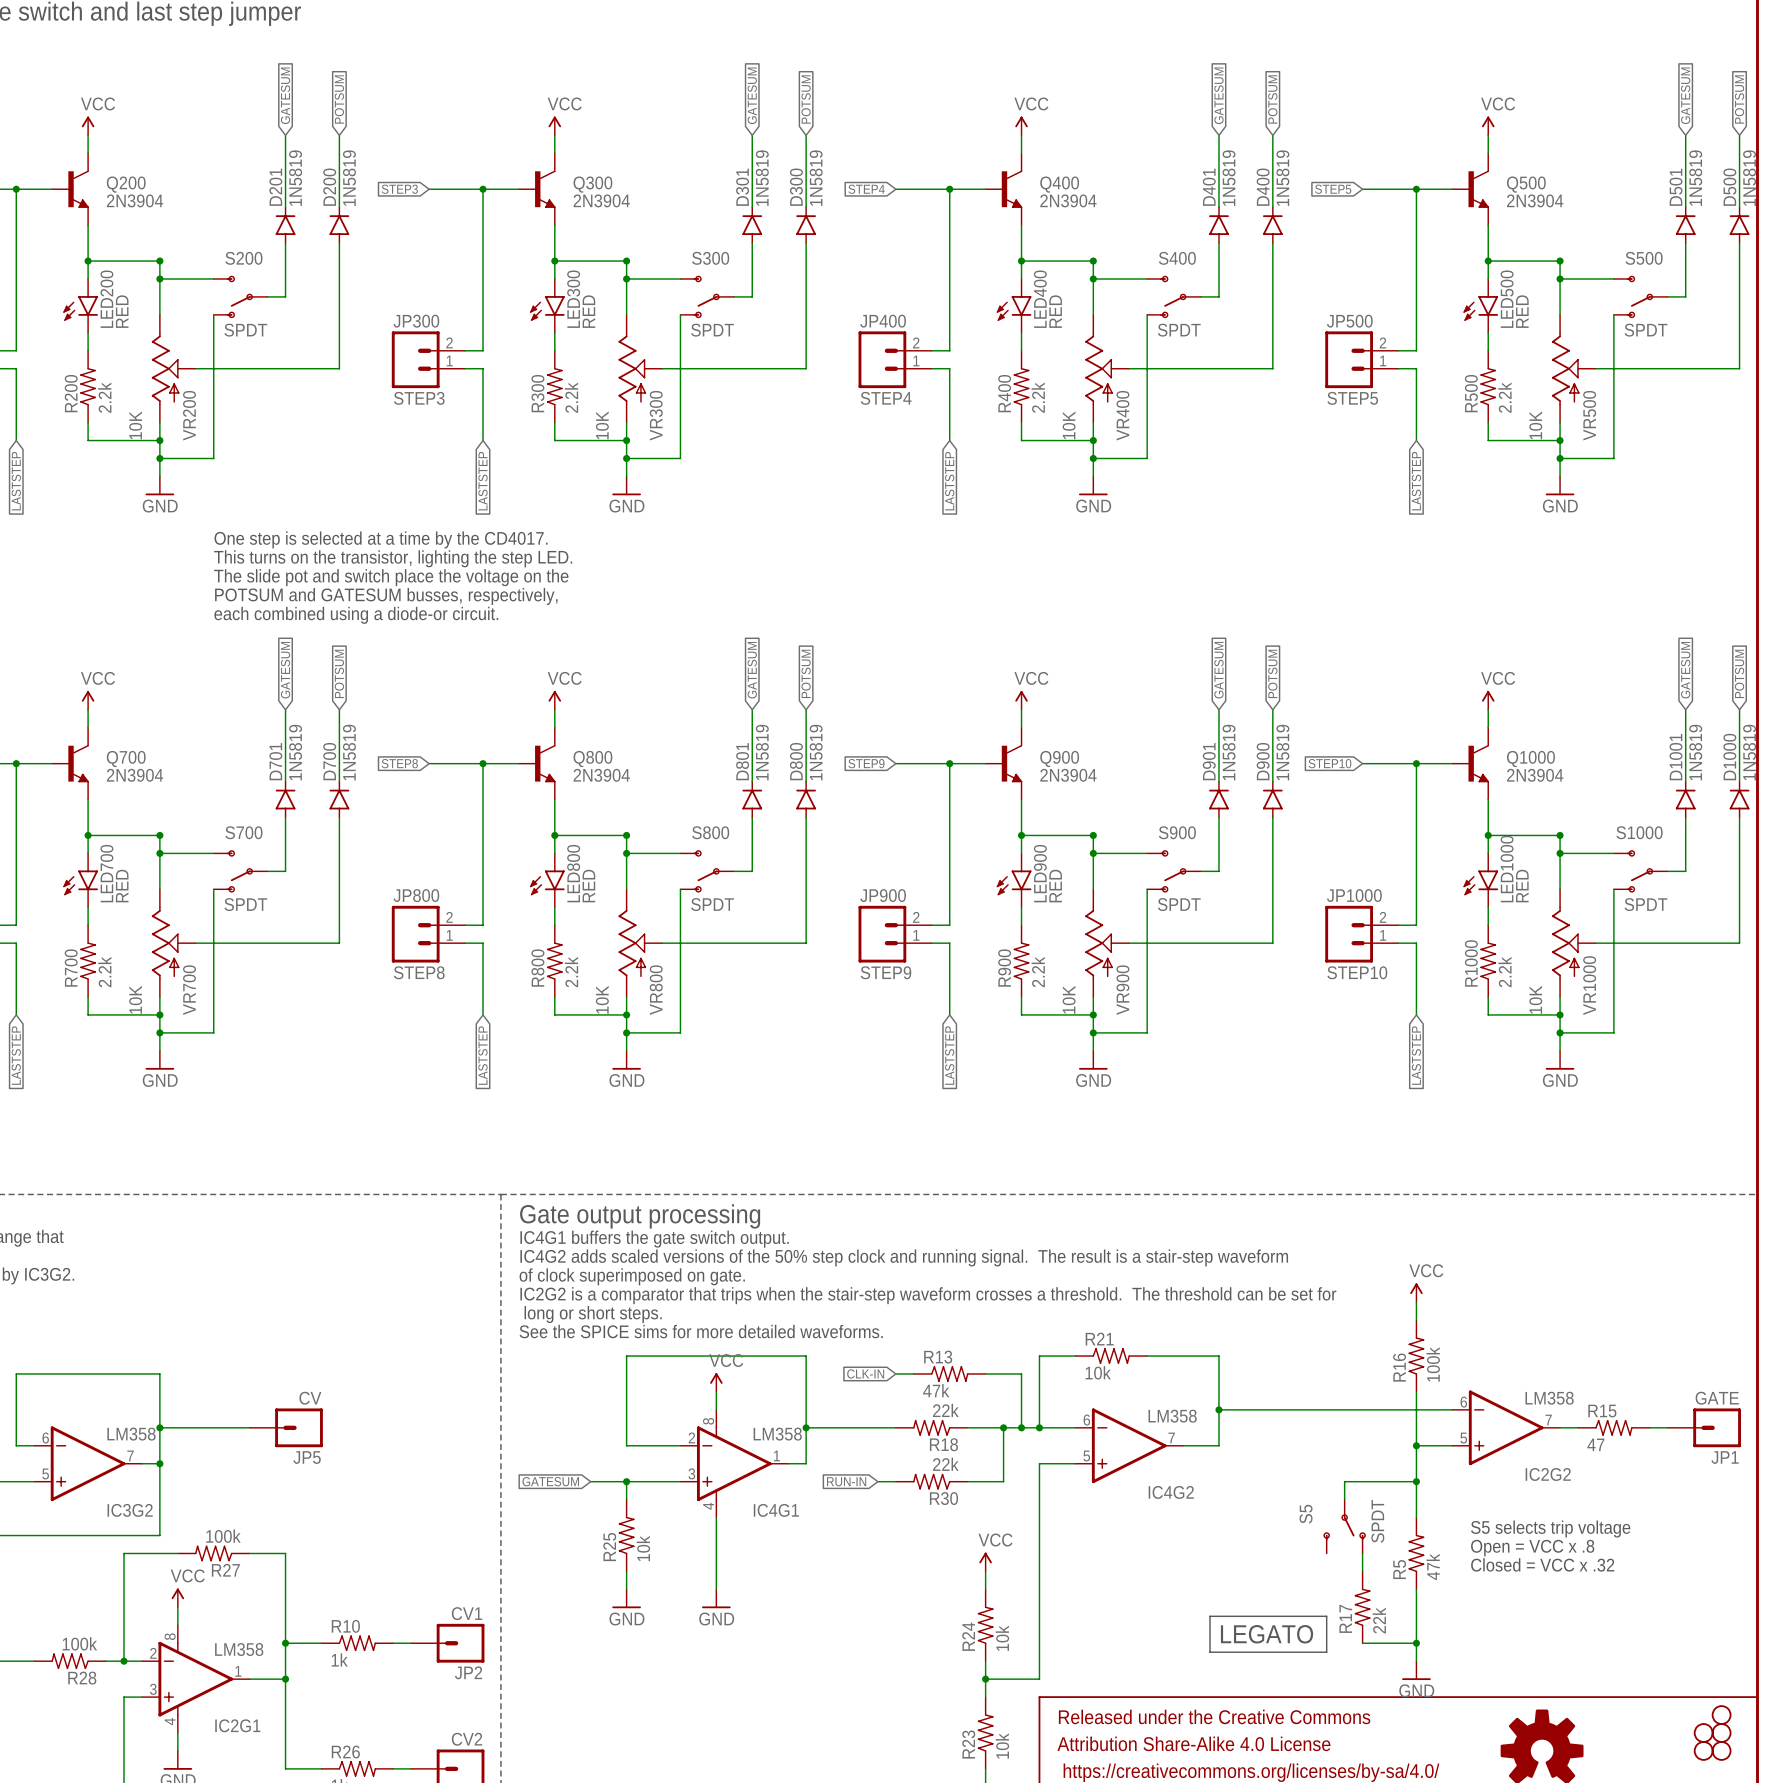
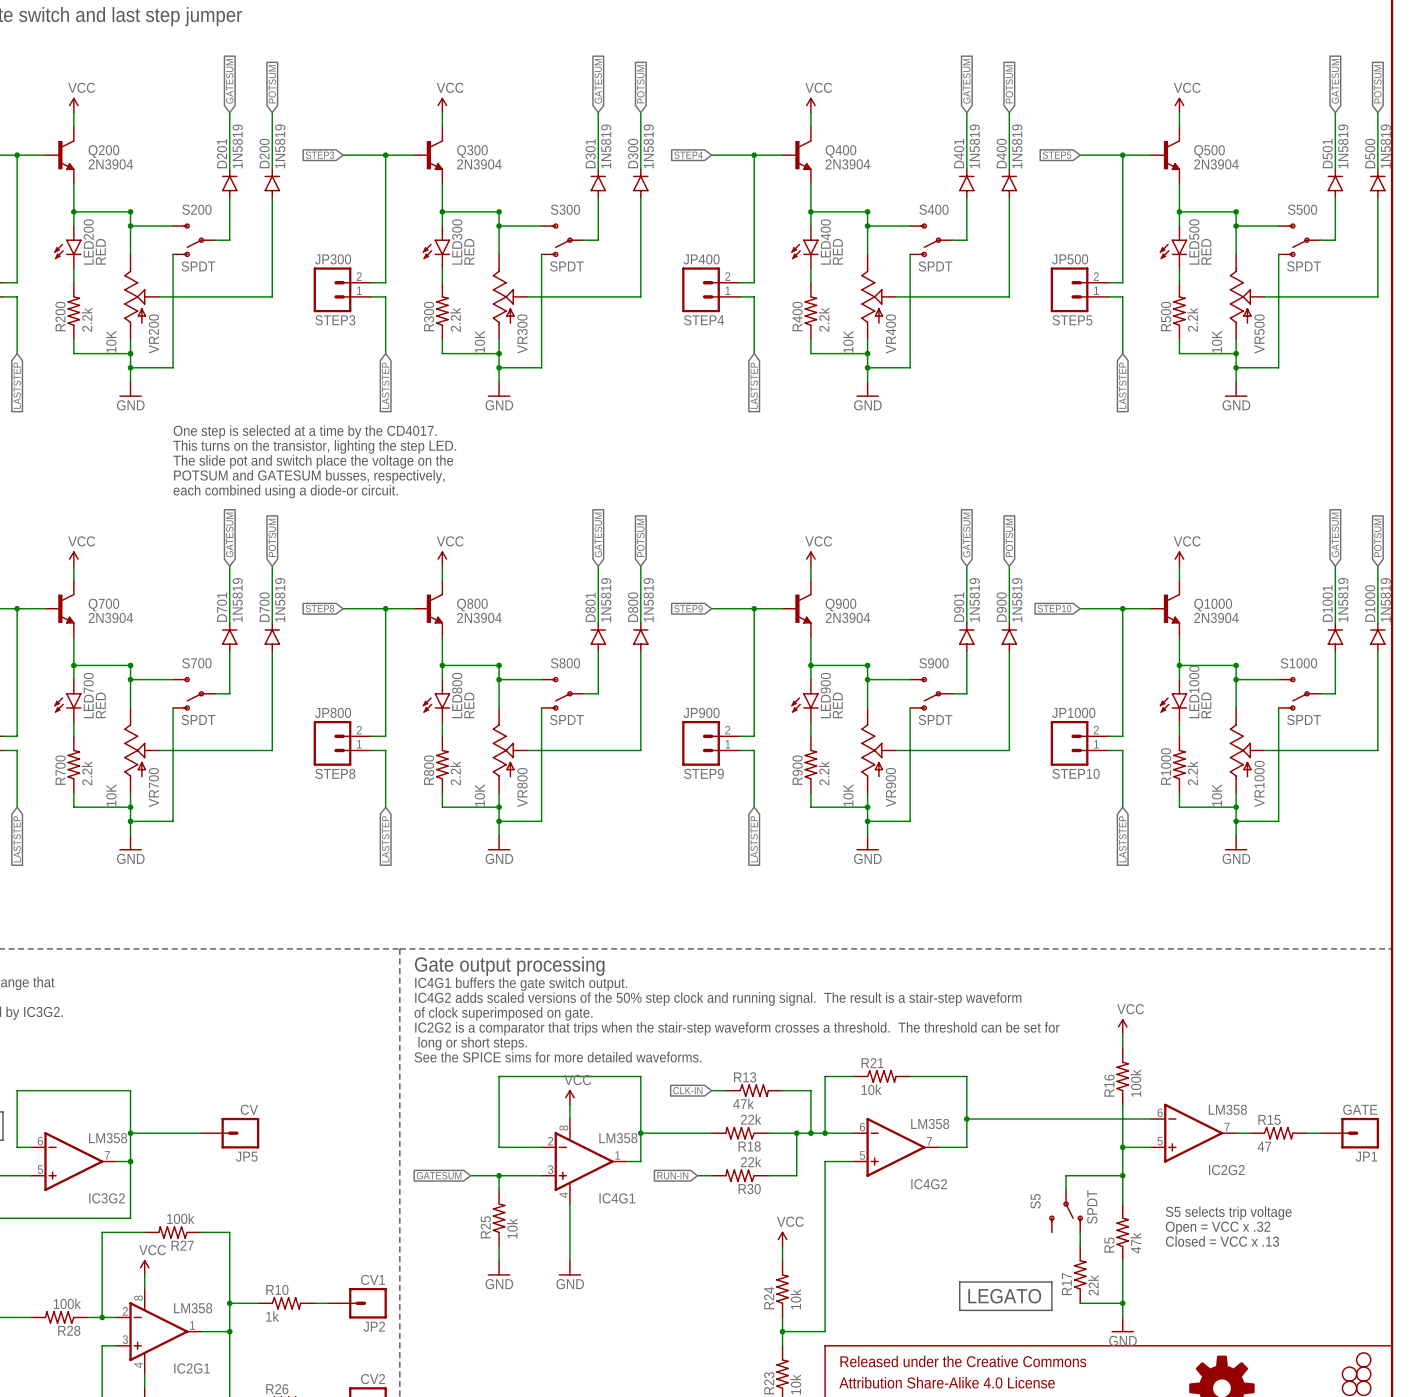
text: Open = VCC x .8 (1532, 1548) -> Open = VCC x .32 (1218, 1228)
text: Closed = VCC x .32 (1542, 1564) -> Closed = VCC x .13 (1222, 1241)

